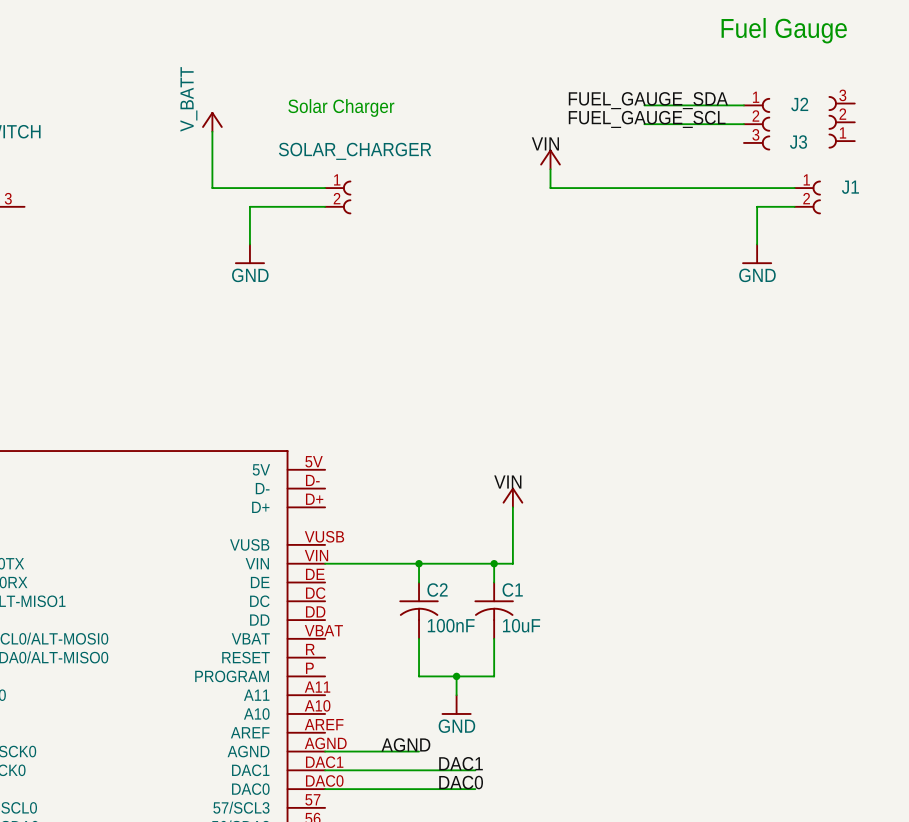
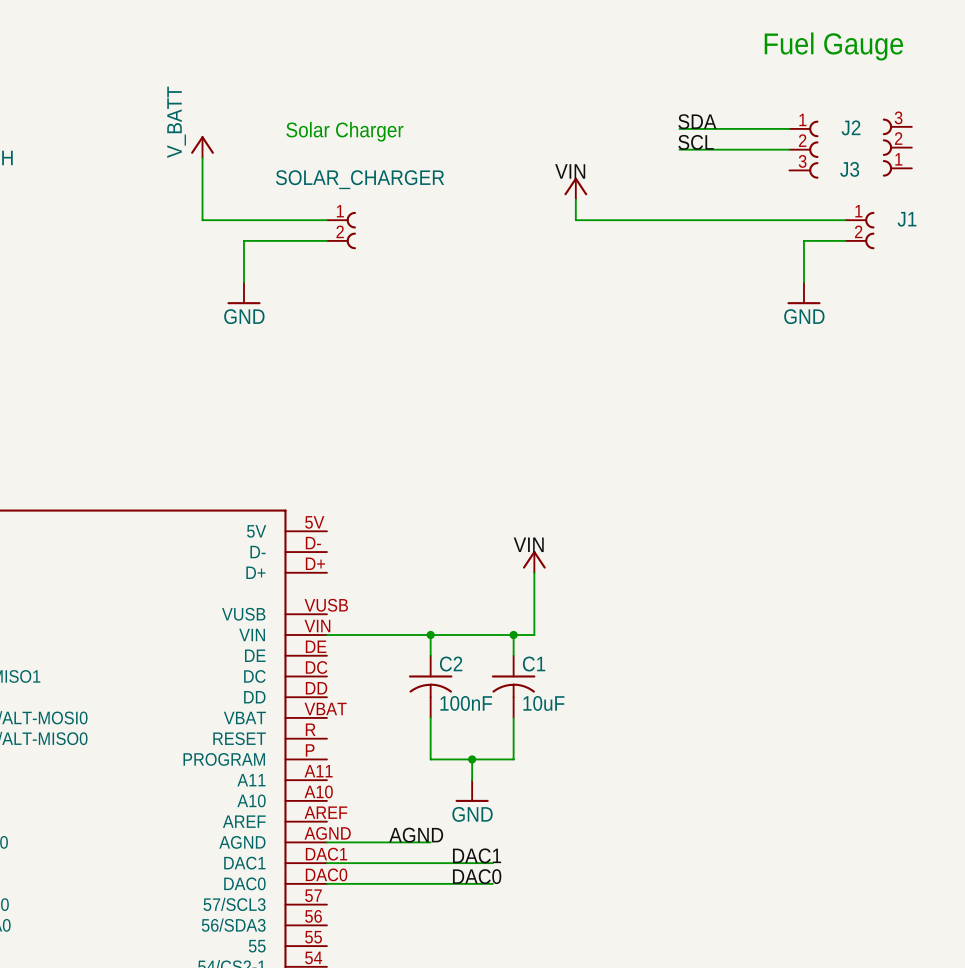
label: none -> SDA (697, 121)
label: FUEL_GAUGE_SDA (648, 100) -> none
label: none -> SCL (696, 142)
label: FUEL_GAUGE_SCL (647, 119) -> none

